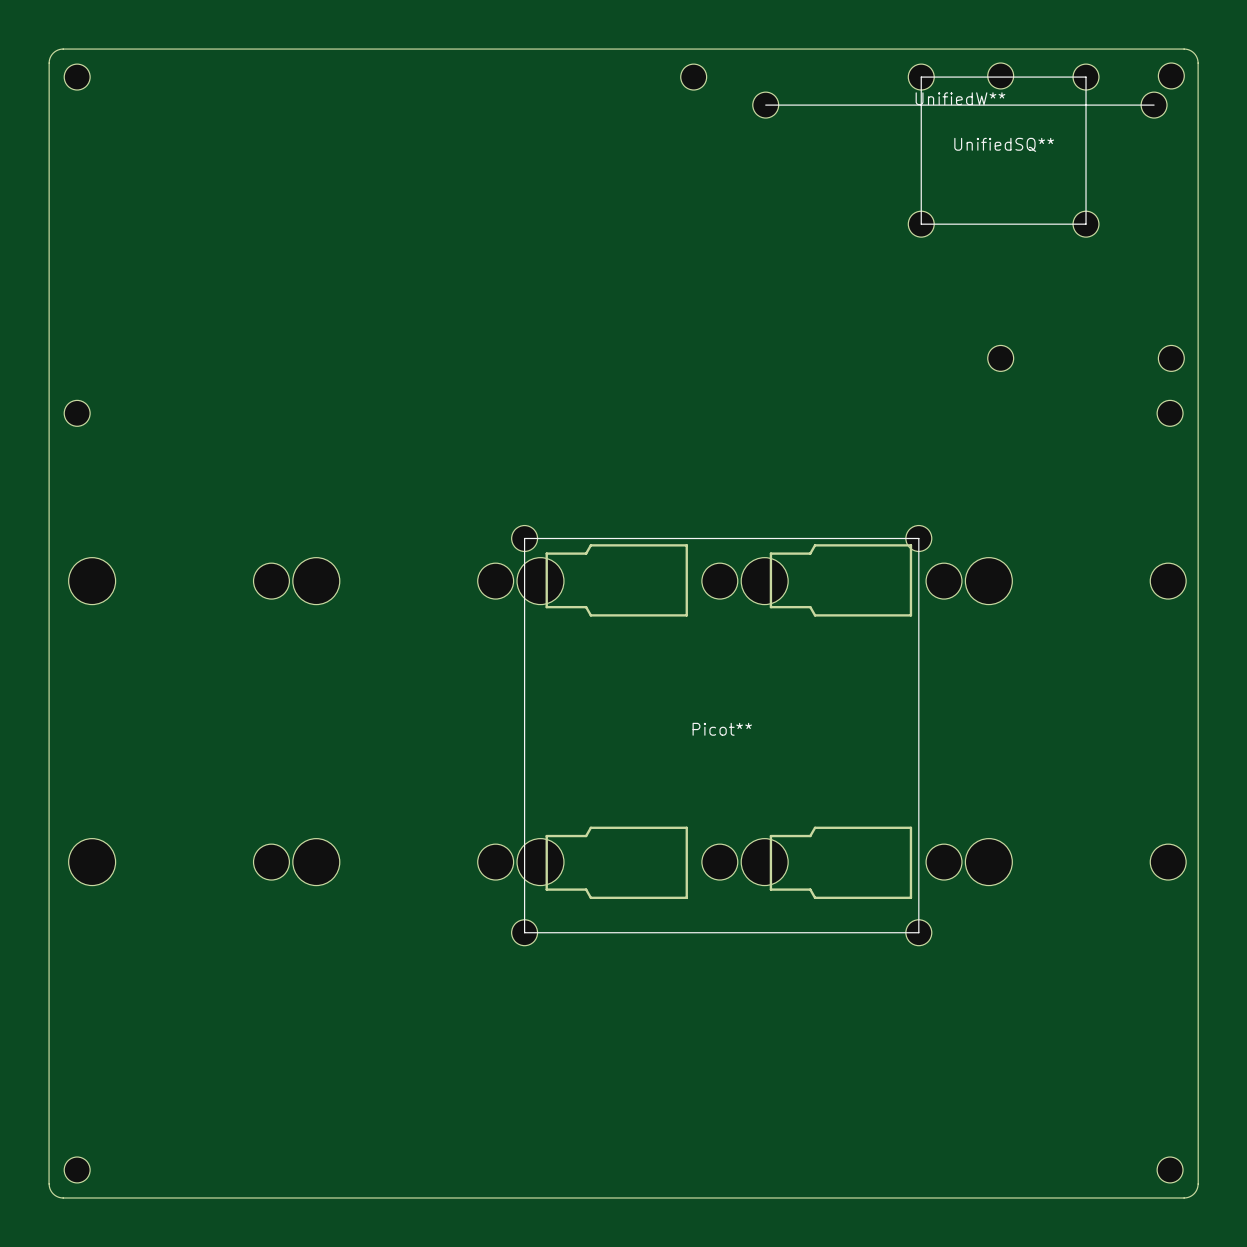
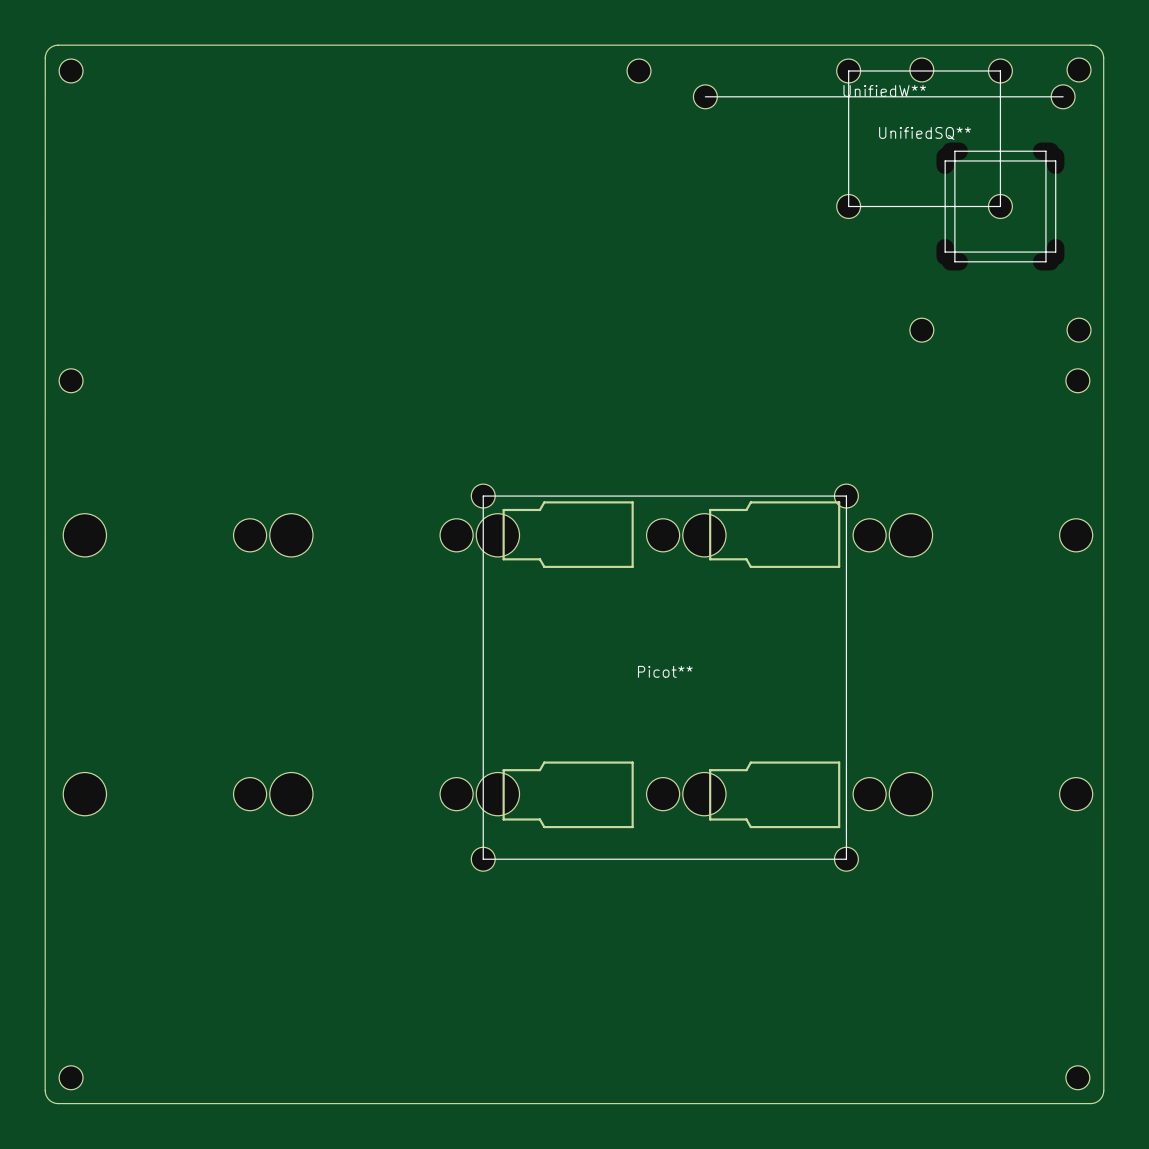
part: none -> (1000, 206)
part: none -> (1000, 206)

